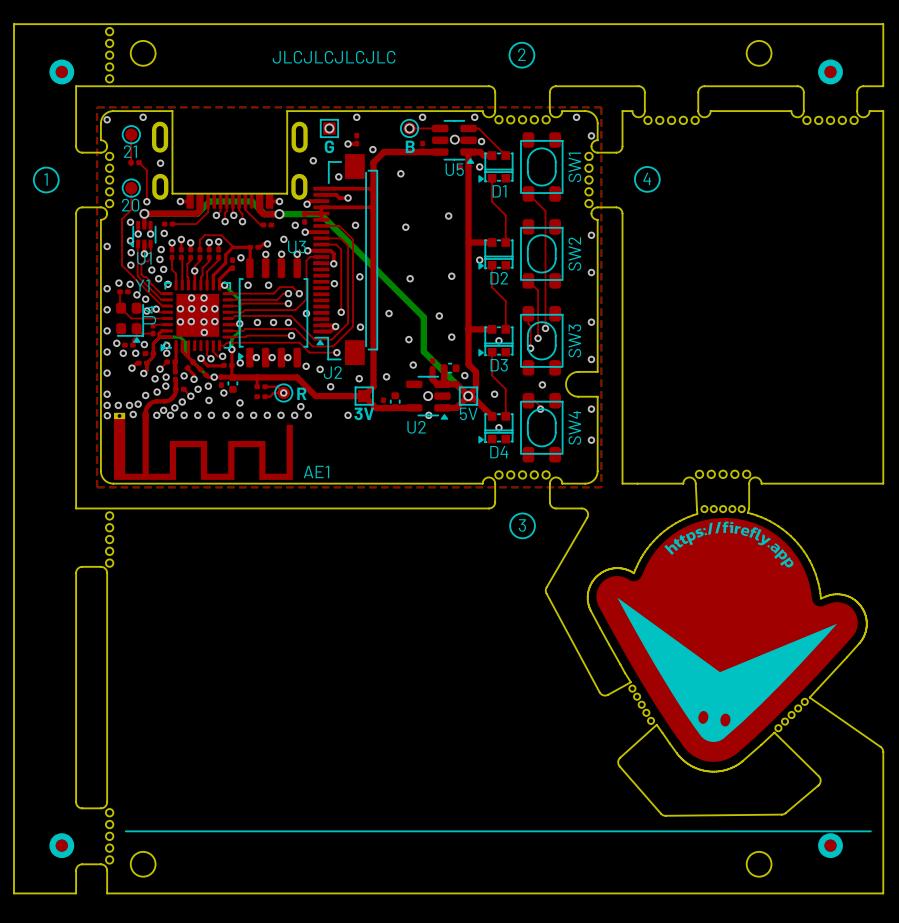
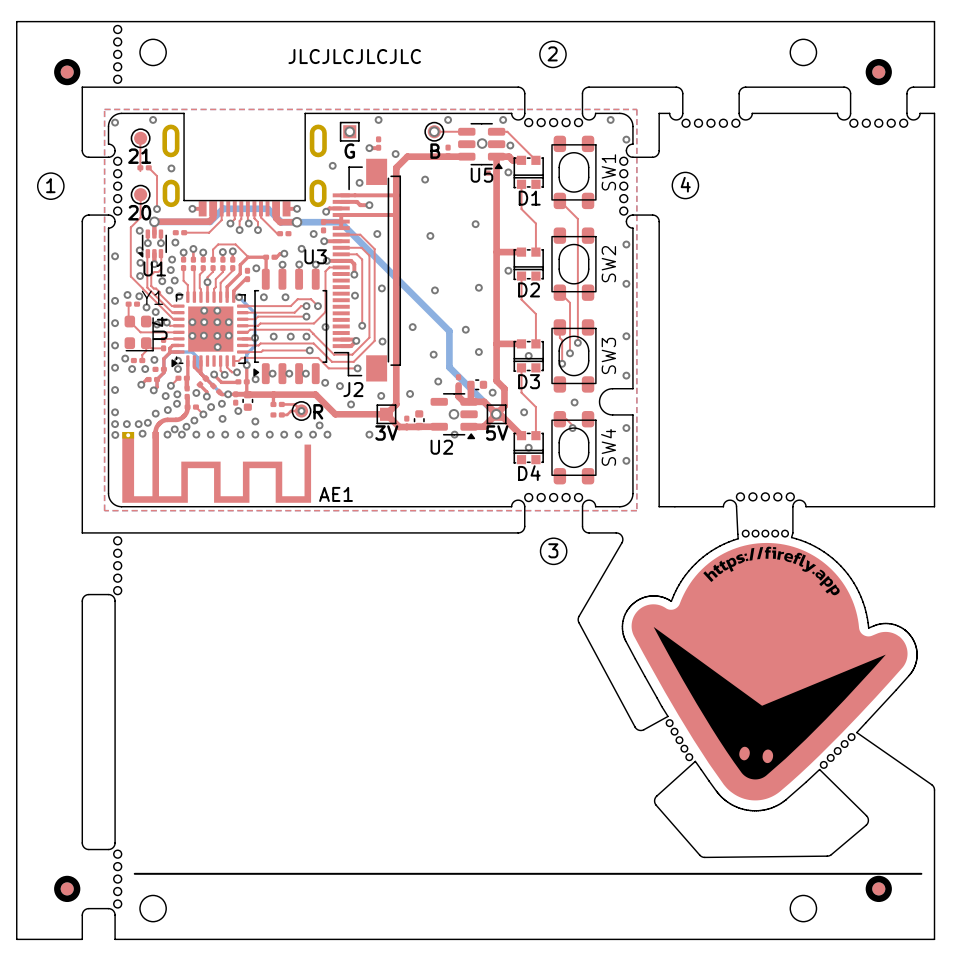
D1 footprint: [478, 151, 514, 183] -> [513, 155, 544, 189]
J2 footprint: [313, 154, 378, 366] -> [332, 158, 402, 382]
D2 footprint: [478, 238, 514, 270] -> [513, 247, 544, 281]
Y1 footprint: [116, 302, 144, 343] -> [124, 315, 154, 352]
D3 footprint: [478, 325, 514, 357] -> [513, 339, 544, 373]
D4 footprint: [478, 411, 514, 444] -> [513, 431, 544, 465]

